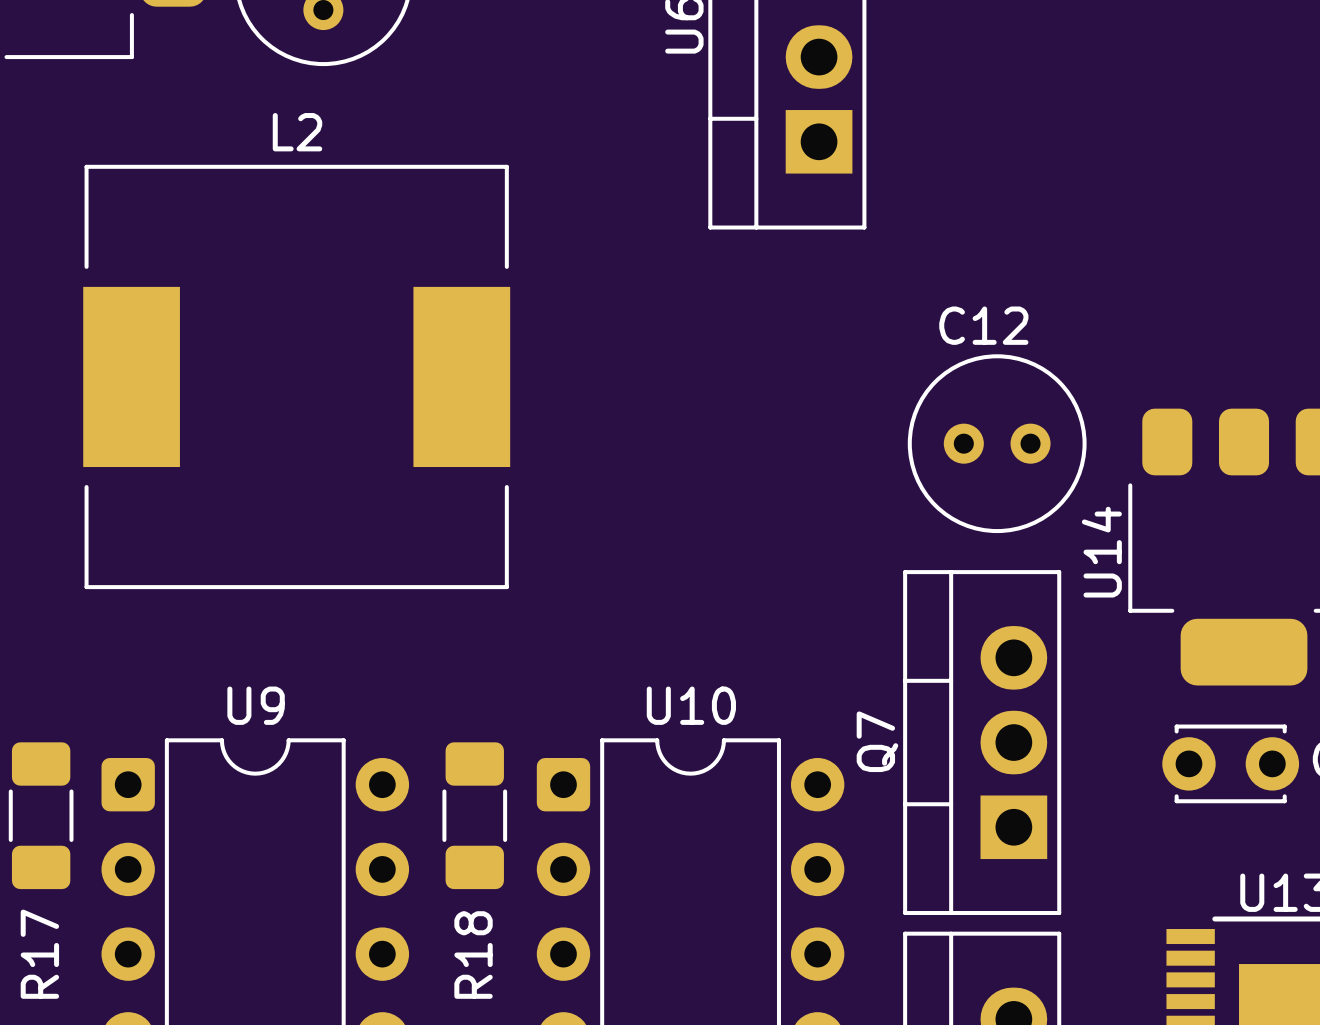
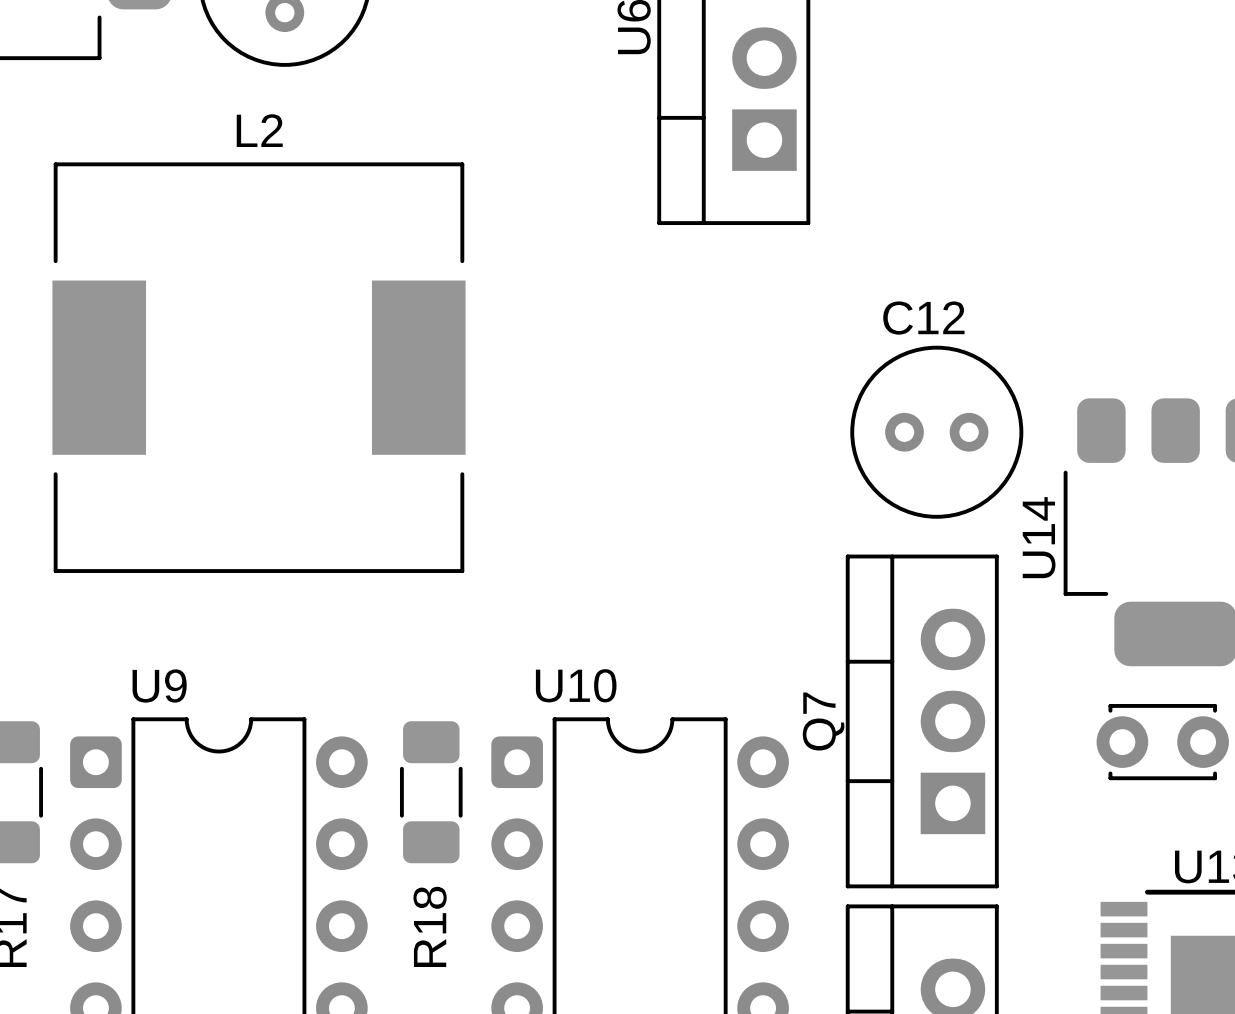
U9 name position: U9 (256, 705) -> U9 (159, 686)
U10 name position: U10 (691, 705) -> U10 (576, 685)

